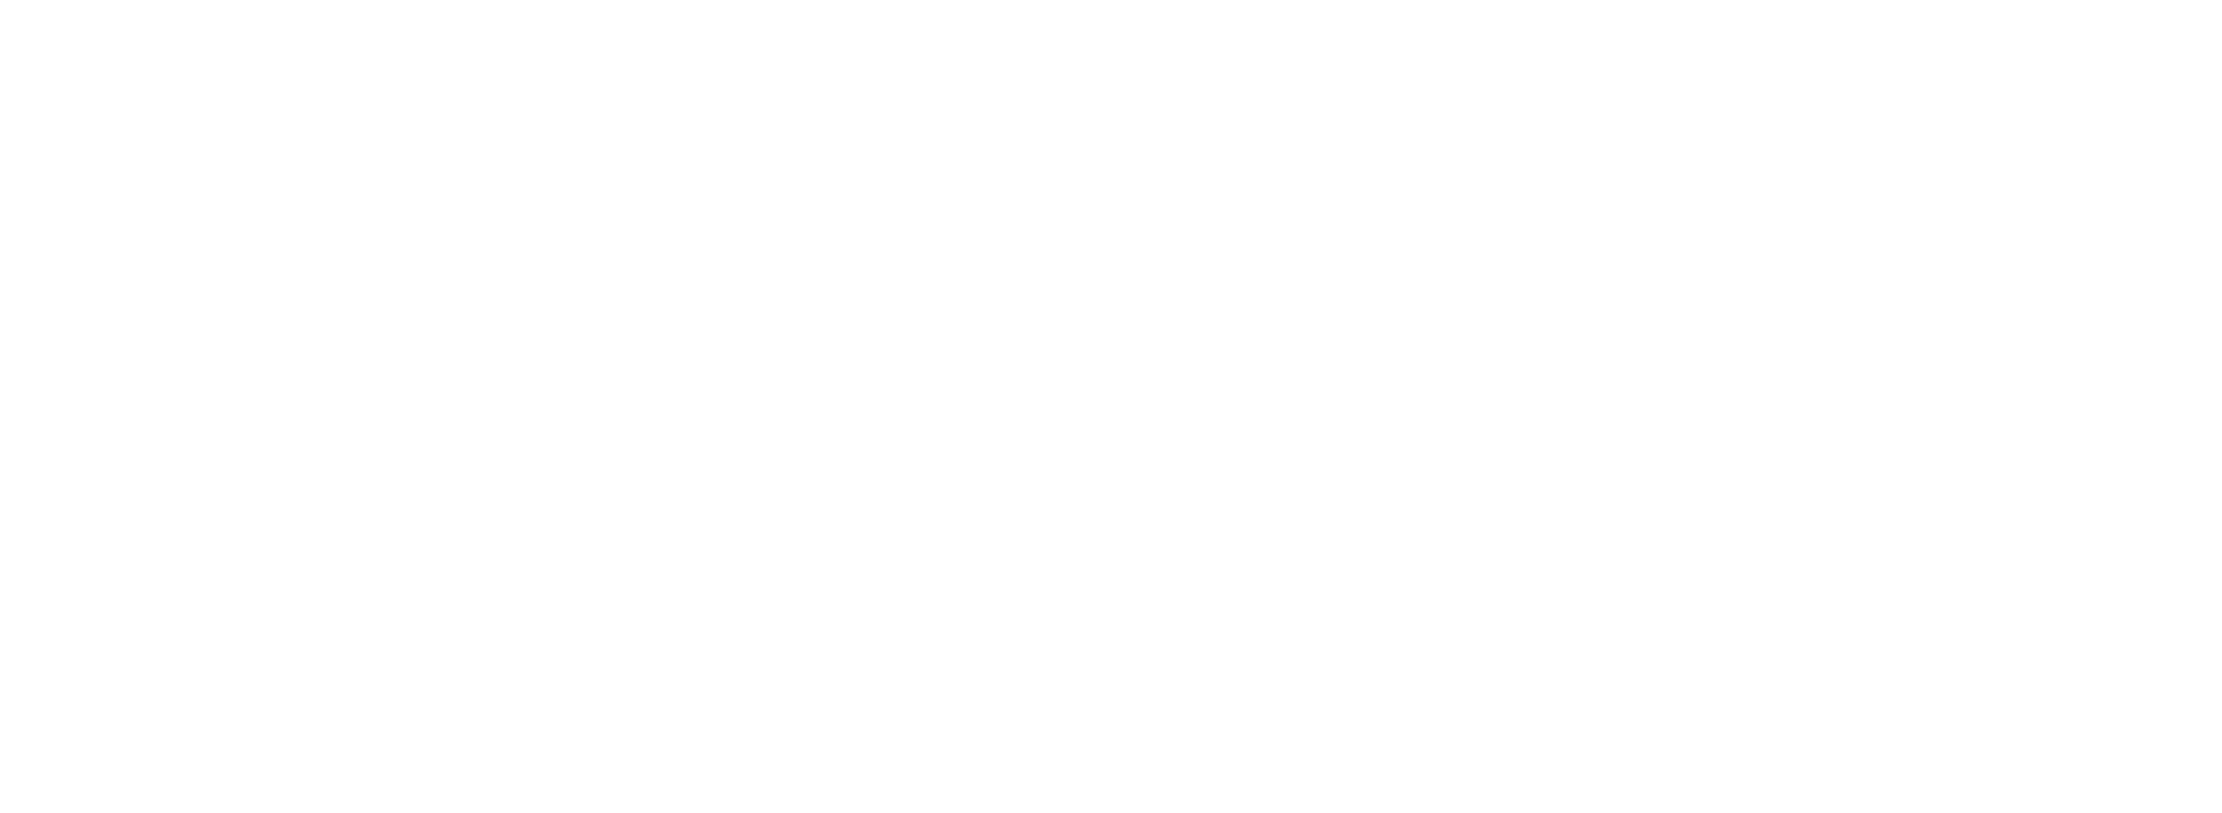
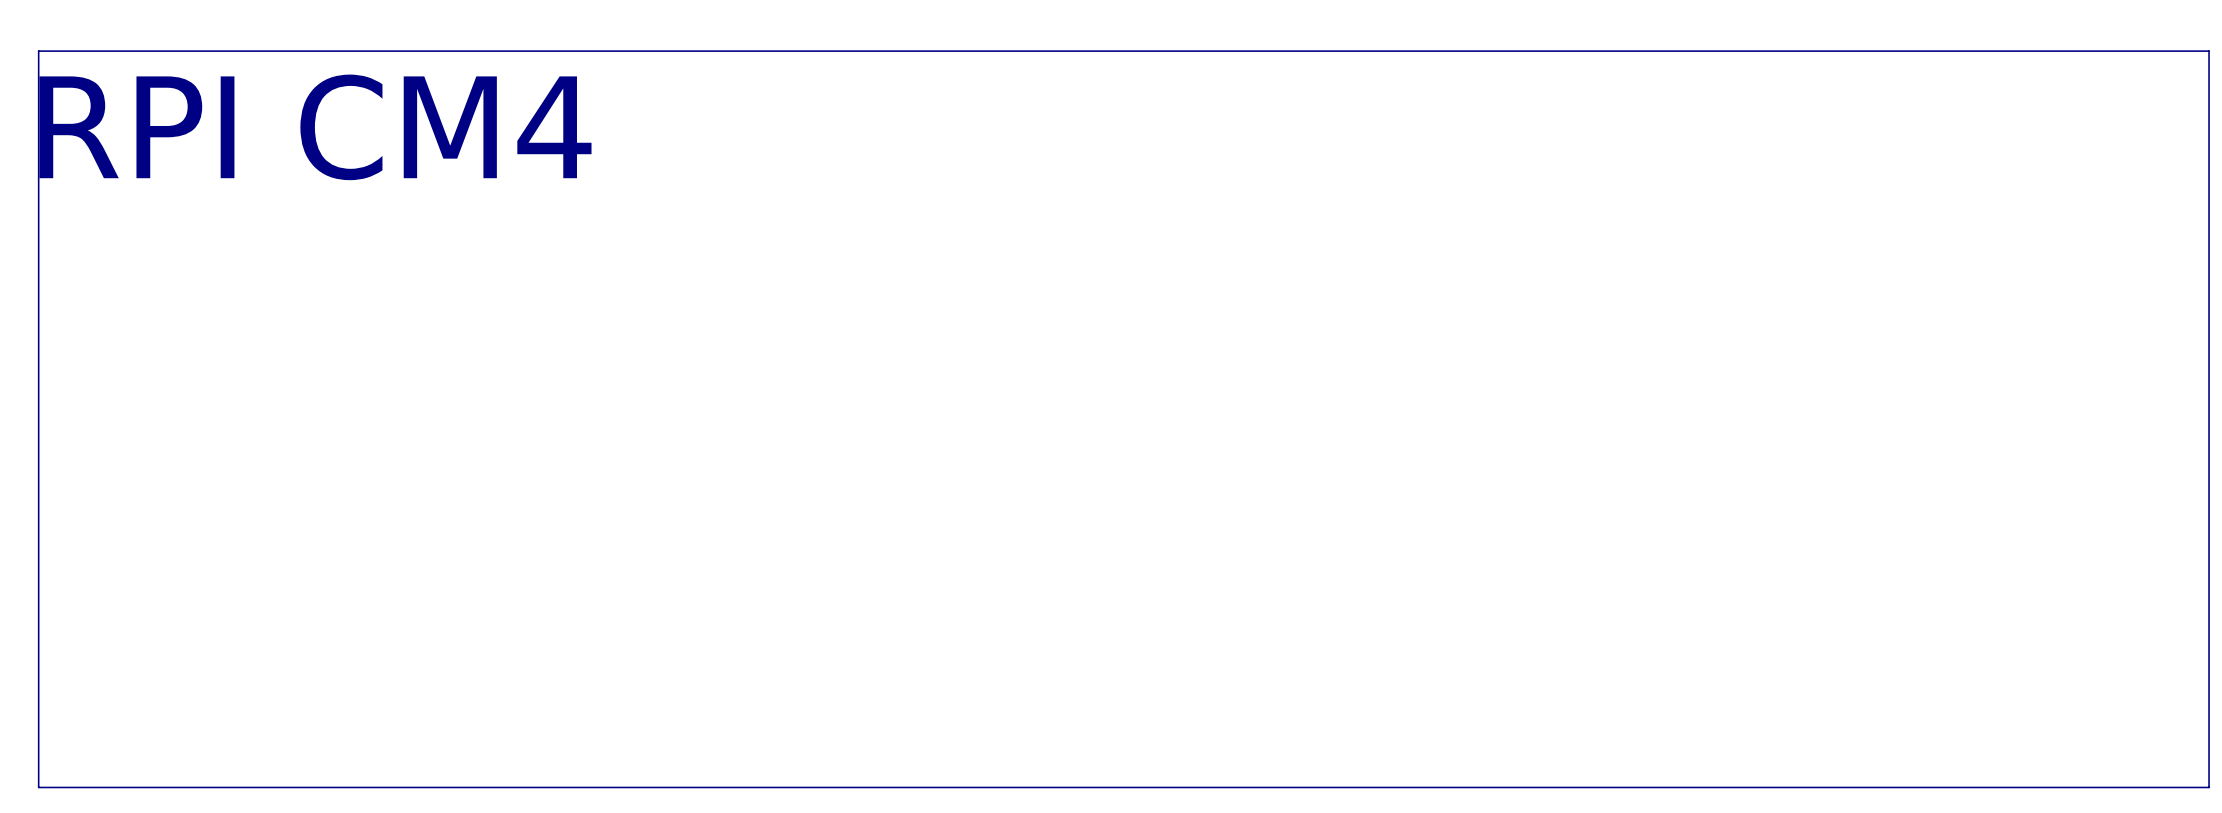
line: none -> (38, 51) (2209, 51) (2209, 787) (38, 787) (38, 51)
text: none -> RPI CM4 (315, 127)

